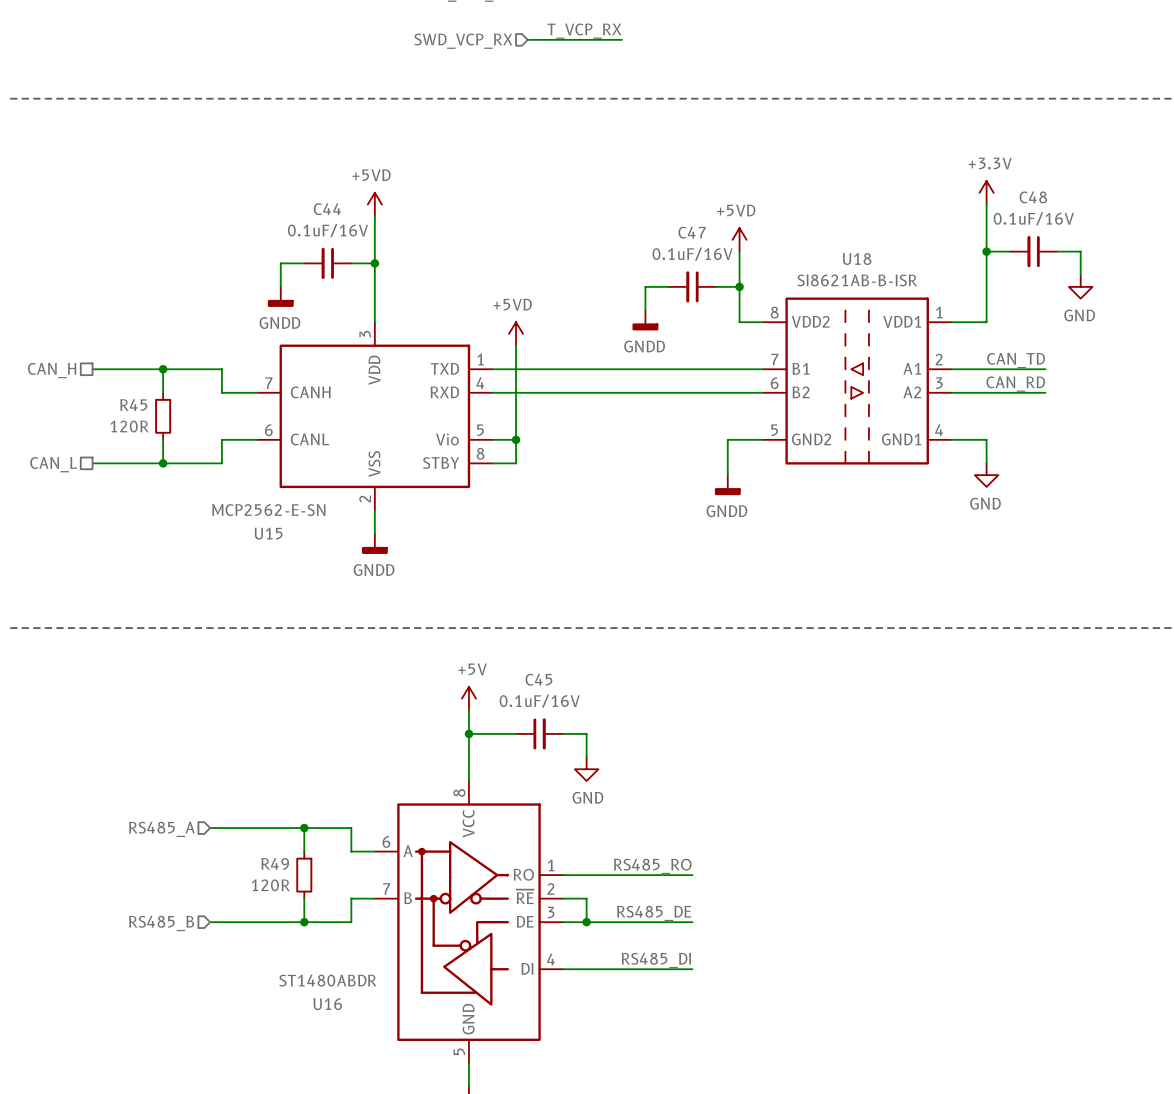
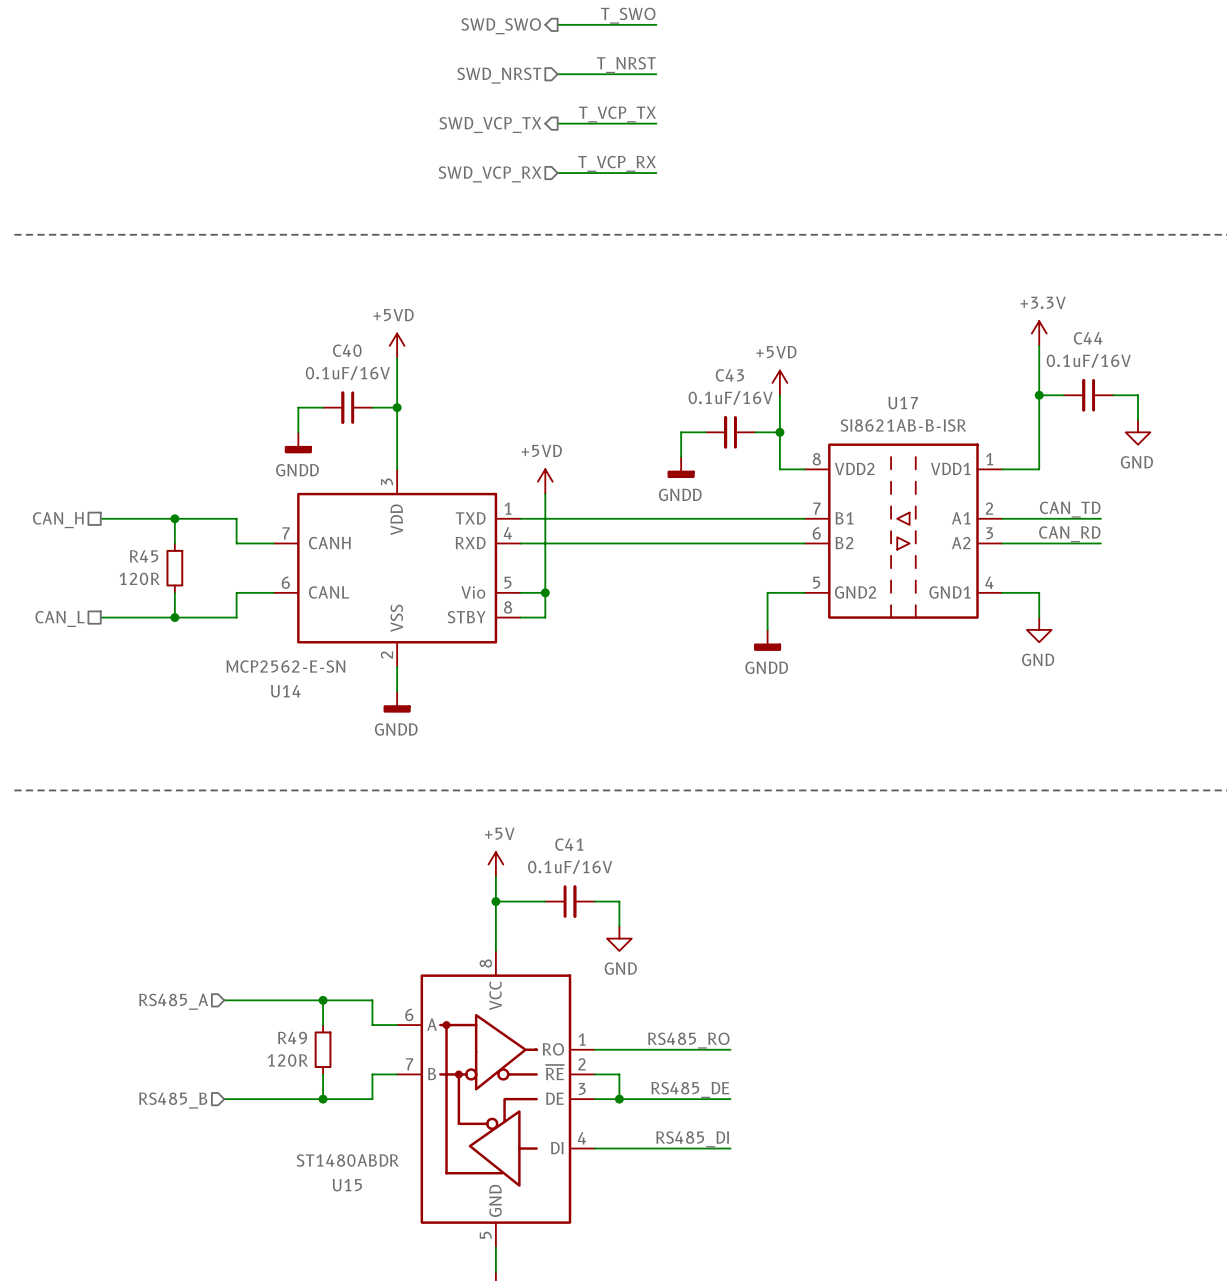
C48 name: C48 (1033, 197) -> C44 (1088, 338)
C44 name: C44 (327, 209) -> C40 (347, 350)
C47 name: C47 (692, 232) -> C43 (729, 375)
U18 name: U18 (857, 259) -> U17 (903, 403)
U15 name: U15 (268, 533) -> U14 (285, 691)
C45 name: C45 (538, 679) -> C41 (569, 844)
U16 name: U16 (327, 1004) -> U15 (347, 1185)

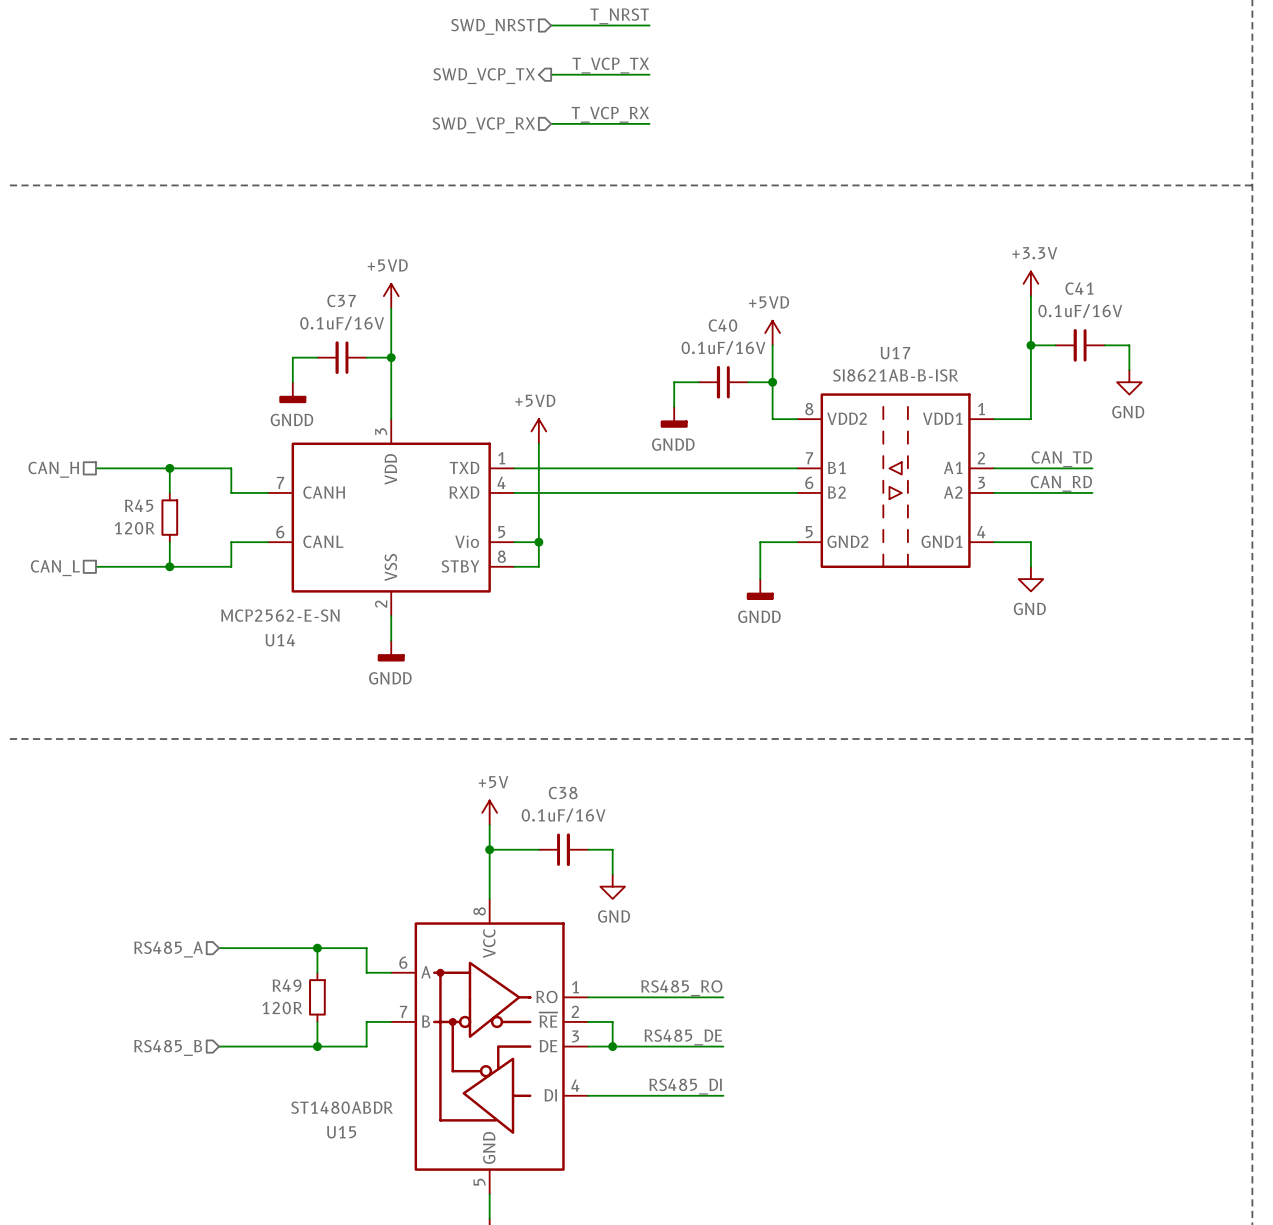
C44 name: C44 (1088, 338) -> C41 (1079, 288)
C40 name: C40 (347, 350) -> C37 (341, 300)
C43 name: C43 (729, 375) -> C40 (722, 325)
C41 name: C41 (569, 844) -> C38 (563, 793)

